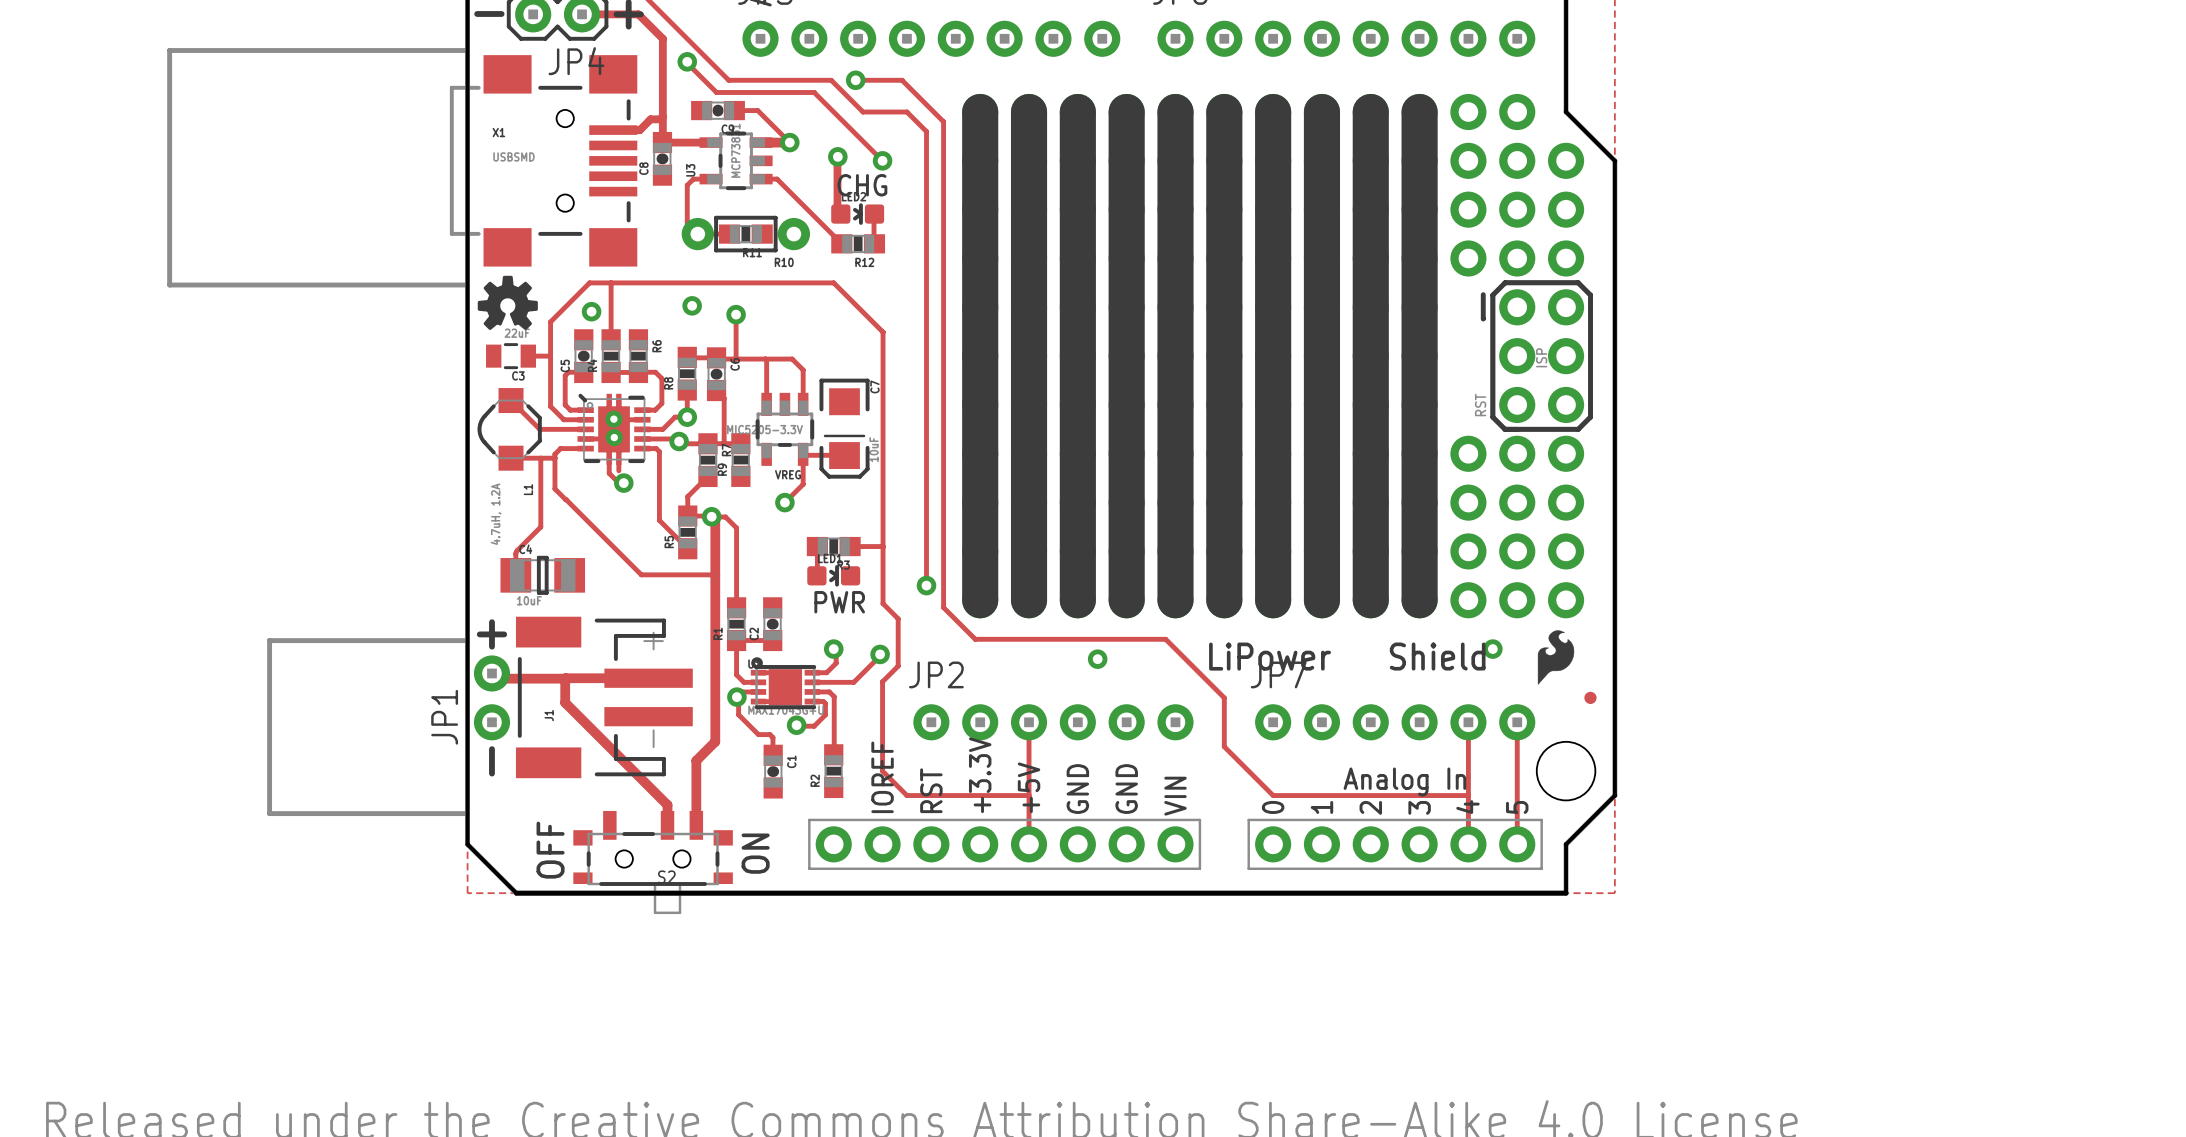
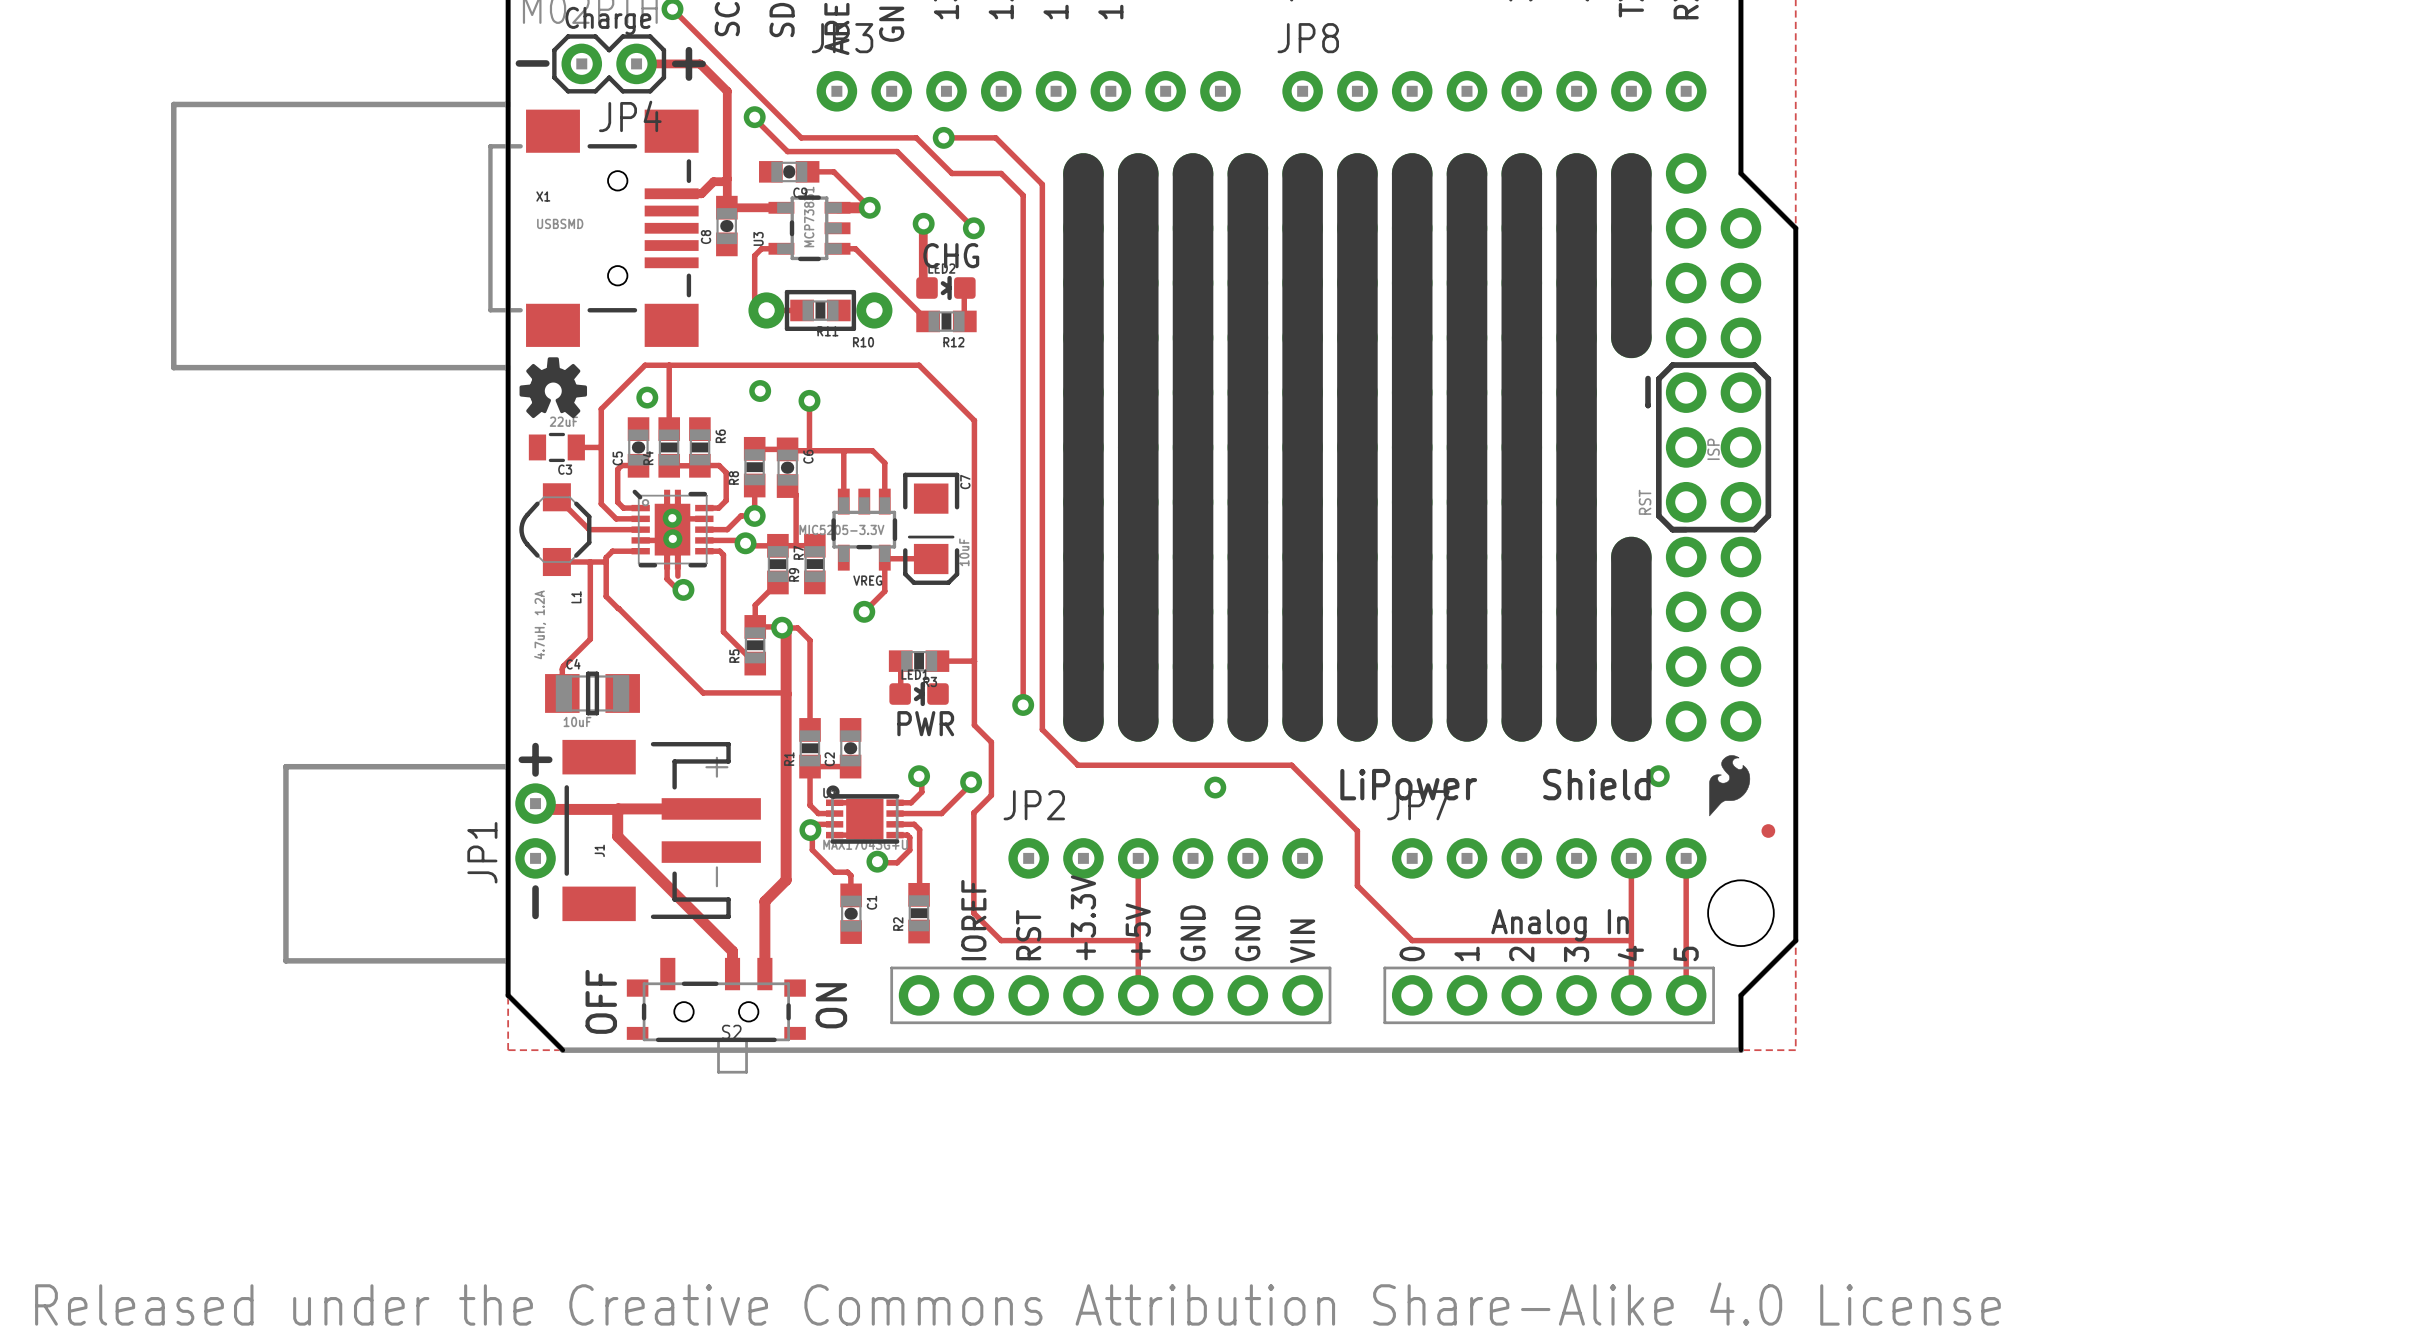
line: none -> (1631, 173) (1631, 337)
line: none -> (1631, 557) (1631, 721)
board edge: (516, 893) (1566, 893) -> none

